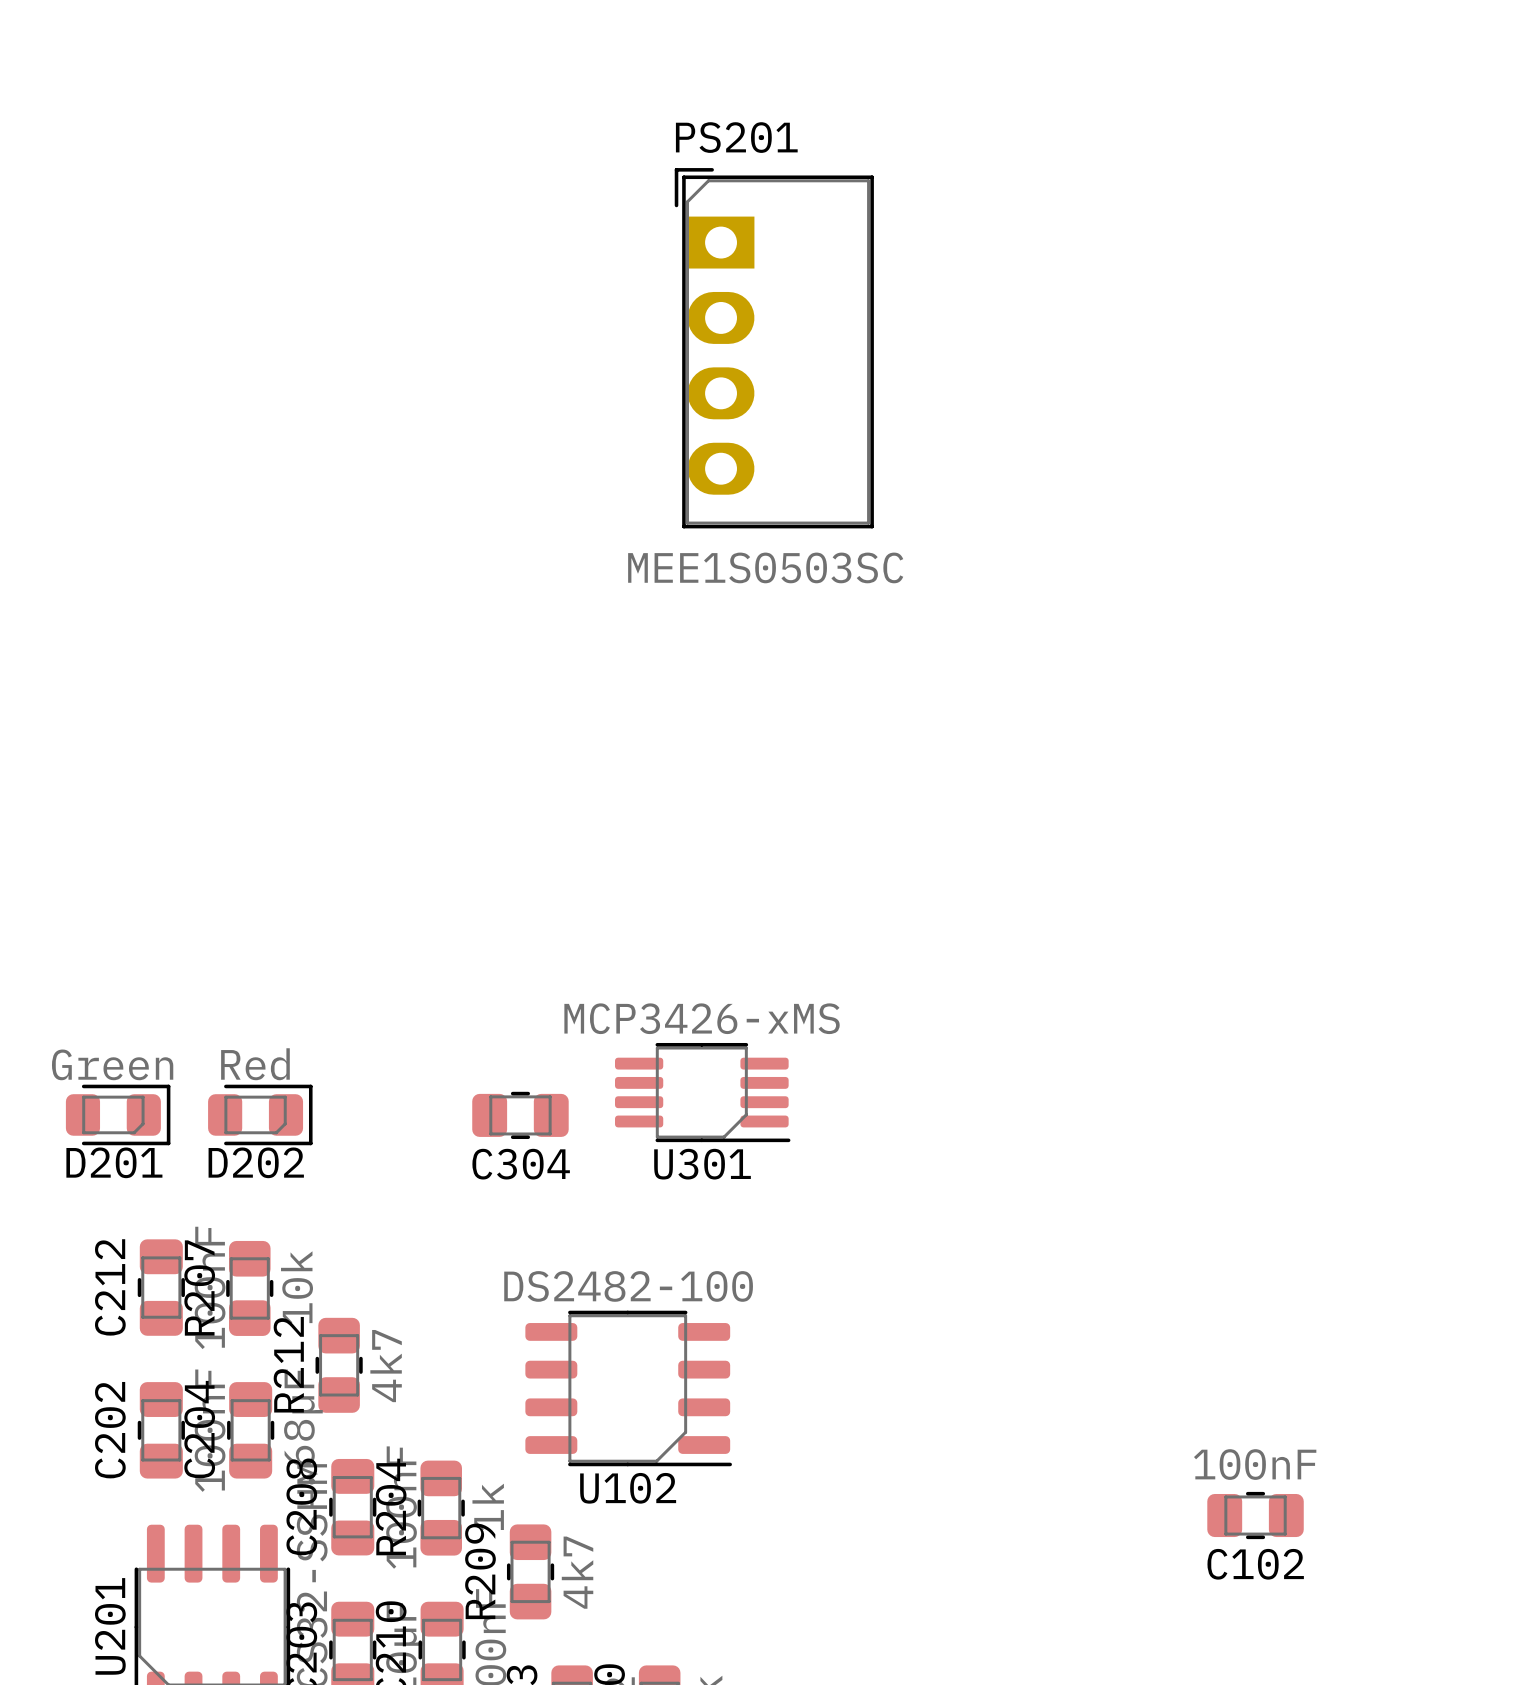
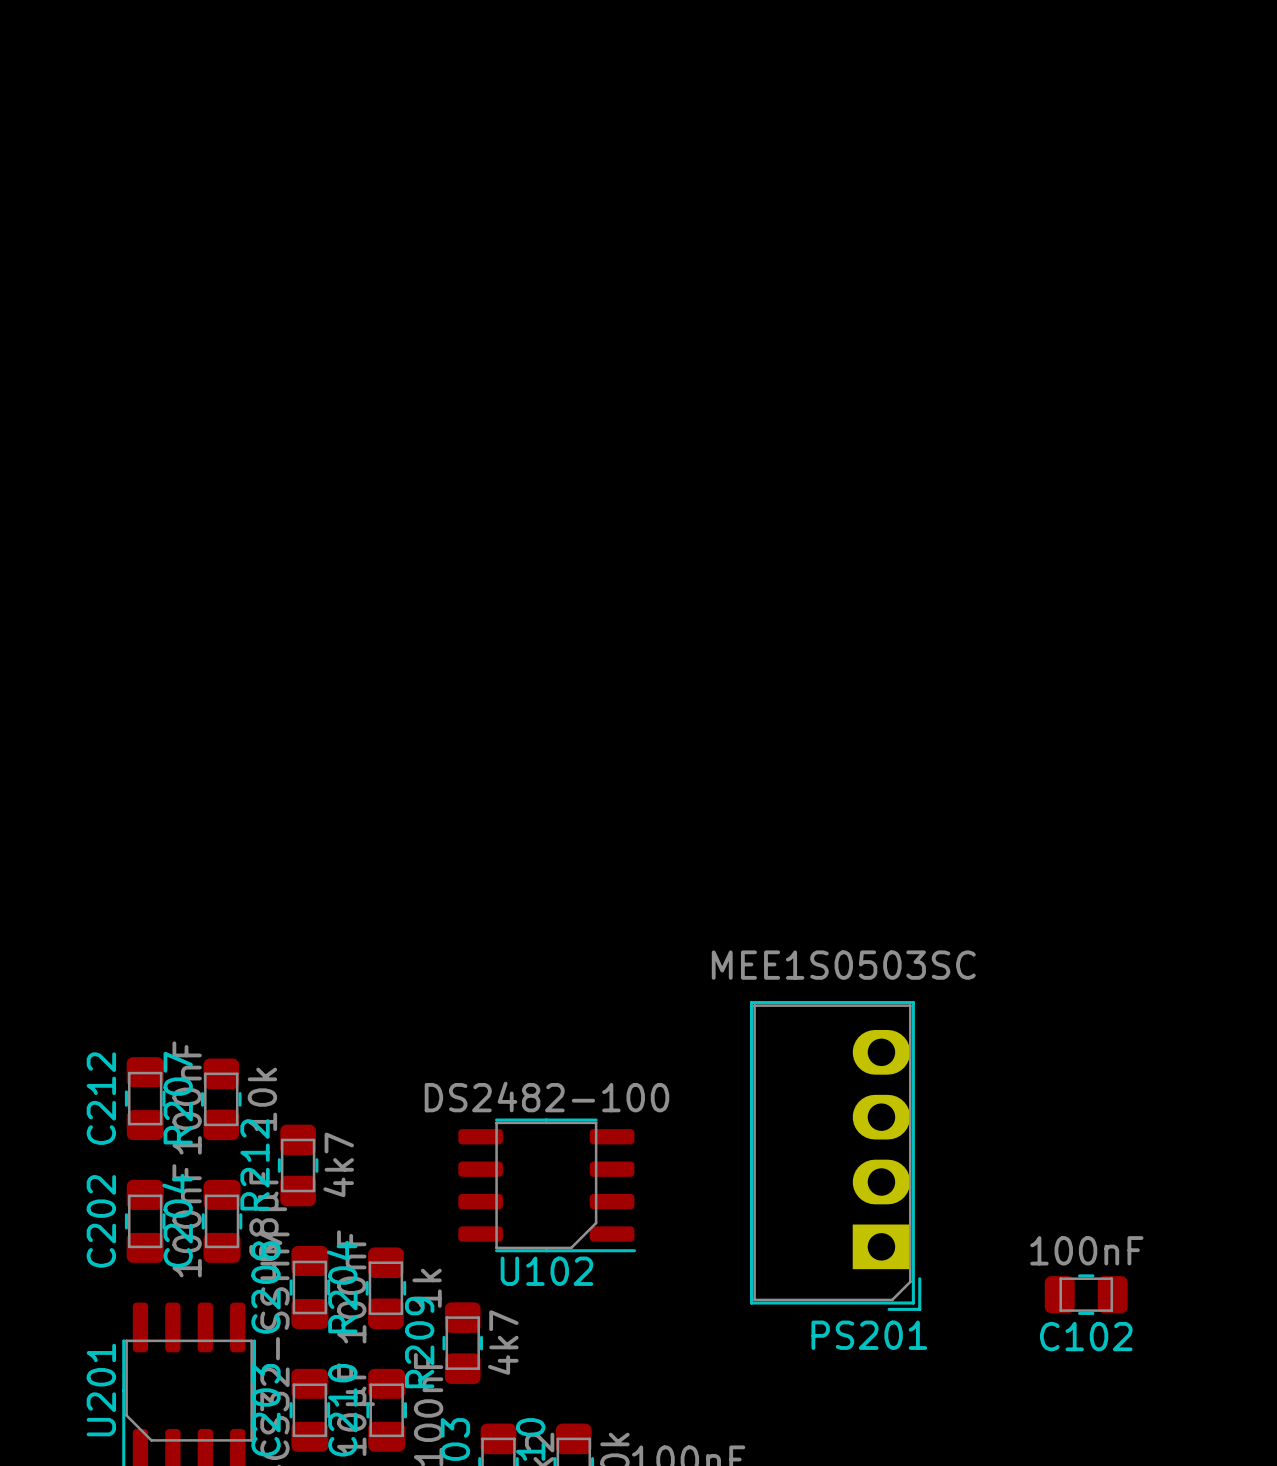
PS201 rotation: 0° (774, 348) -> 180° (835, 1155)
PS201 position: (774, 348) -> (835, 1155)
U301: MCP3426-xMS (702, 1092) -> none
D201: Green (118, 1114) -> none
D202: Red (260, 1114) -> none
C304: (520, 1115) -> none

